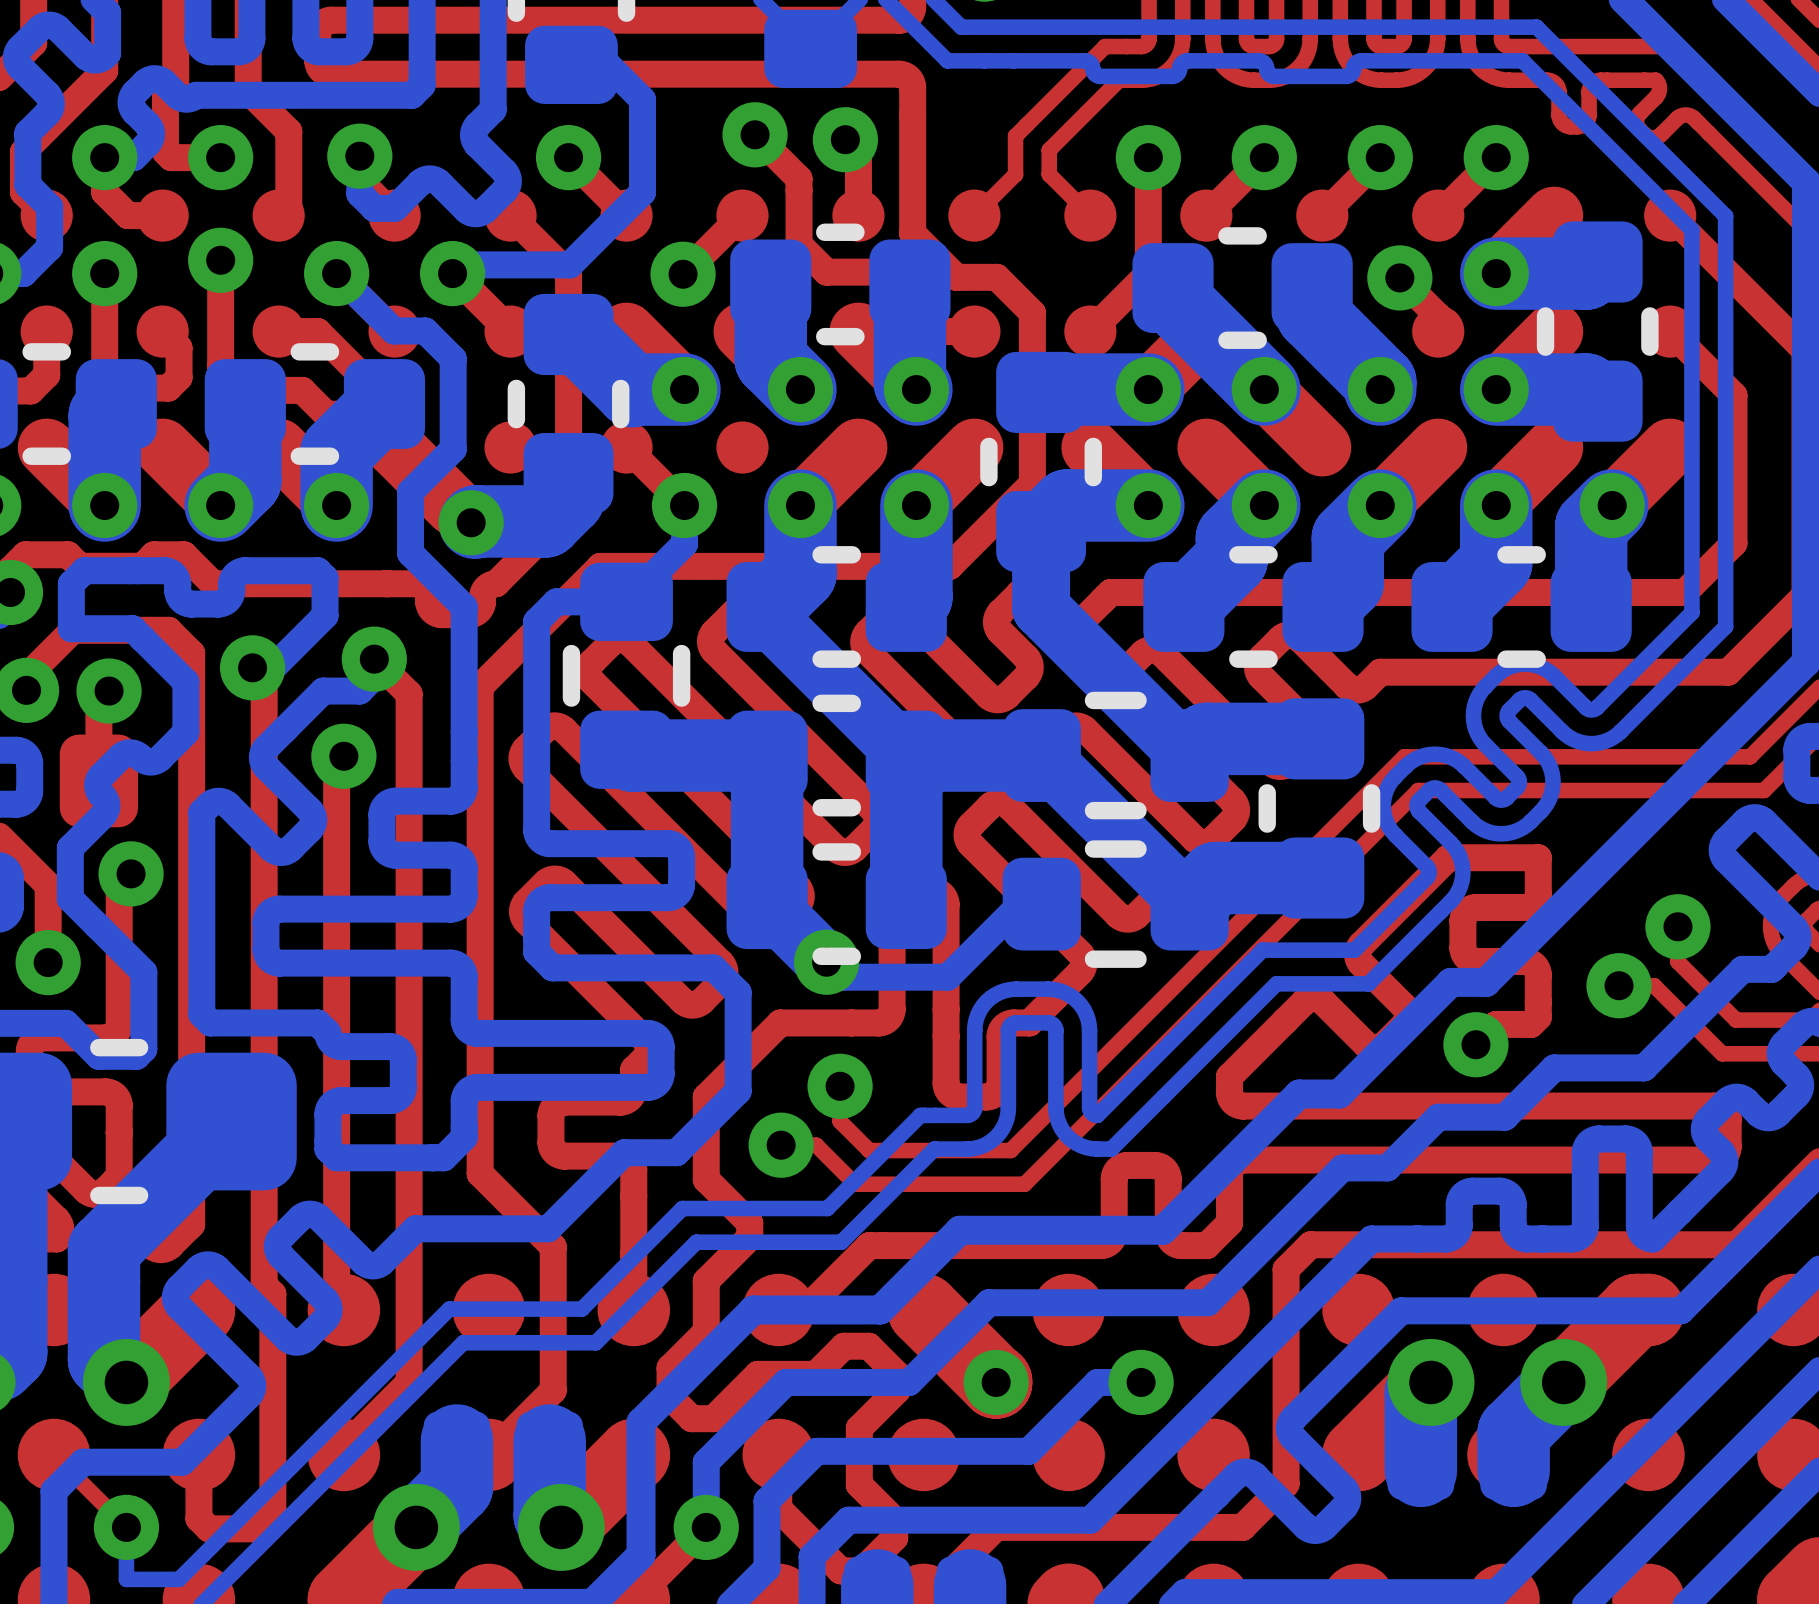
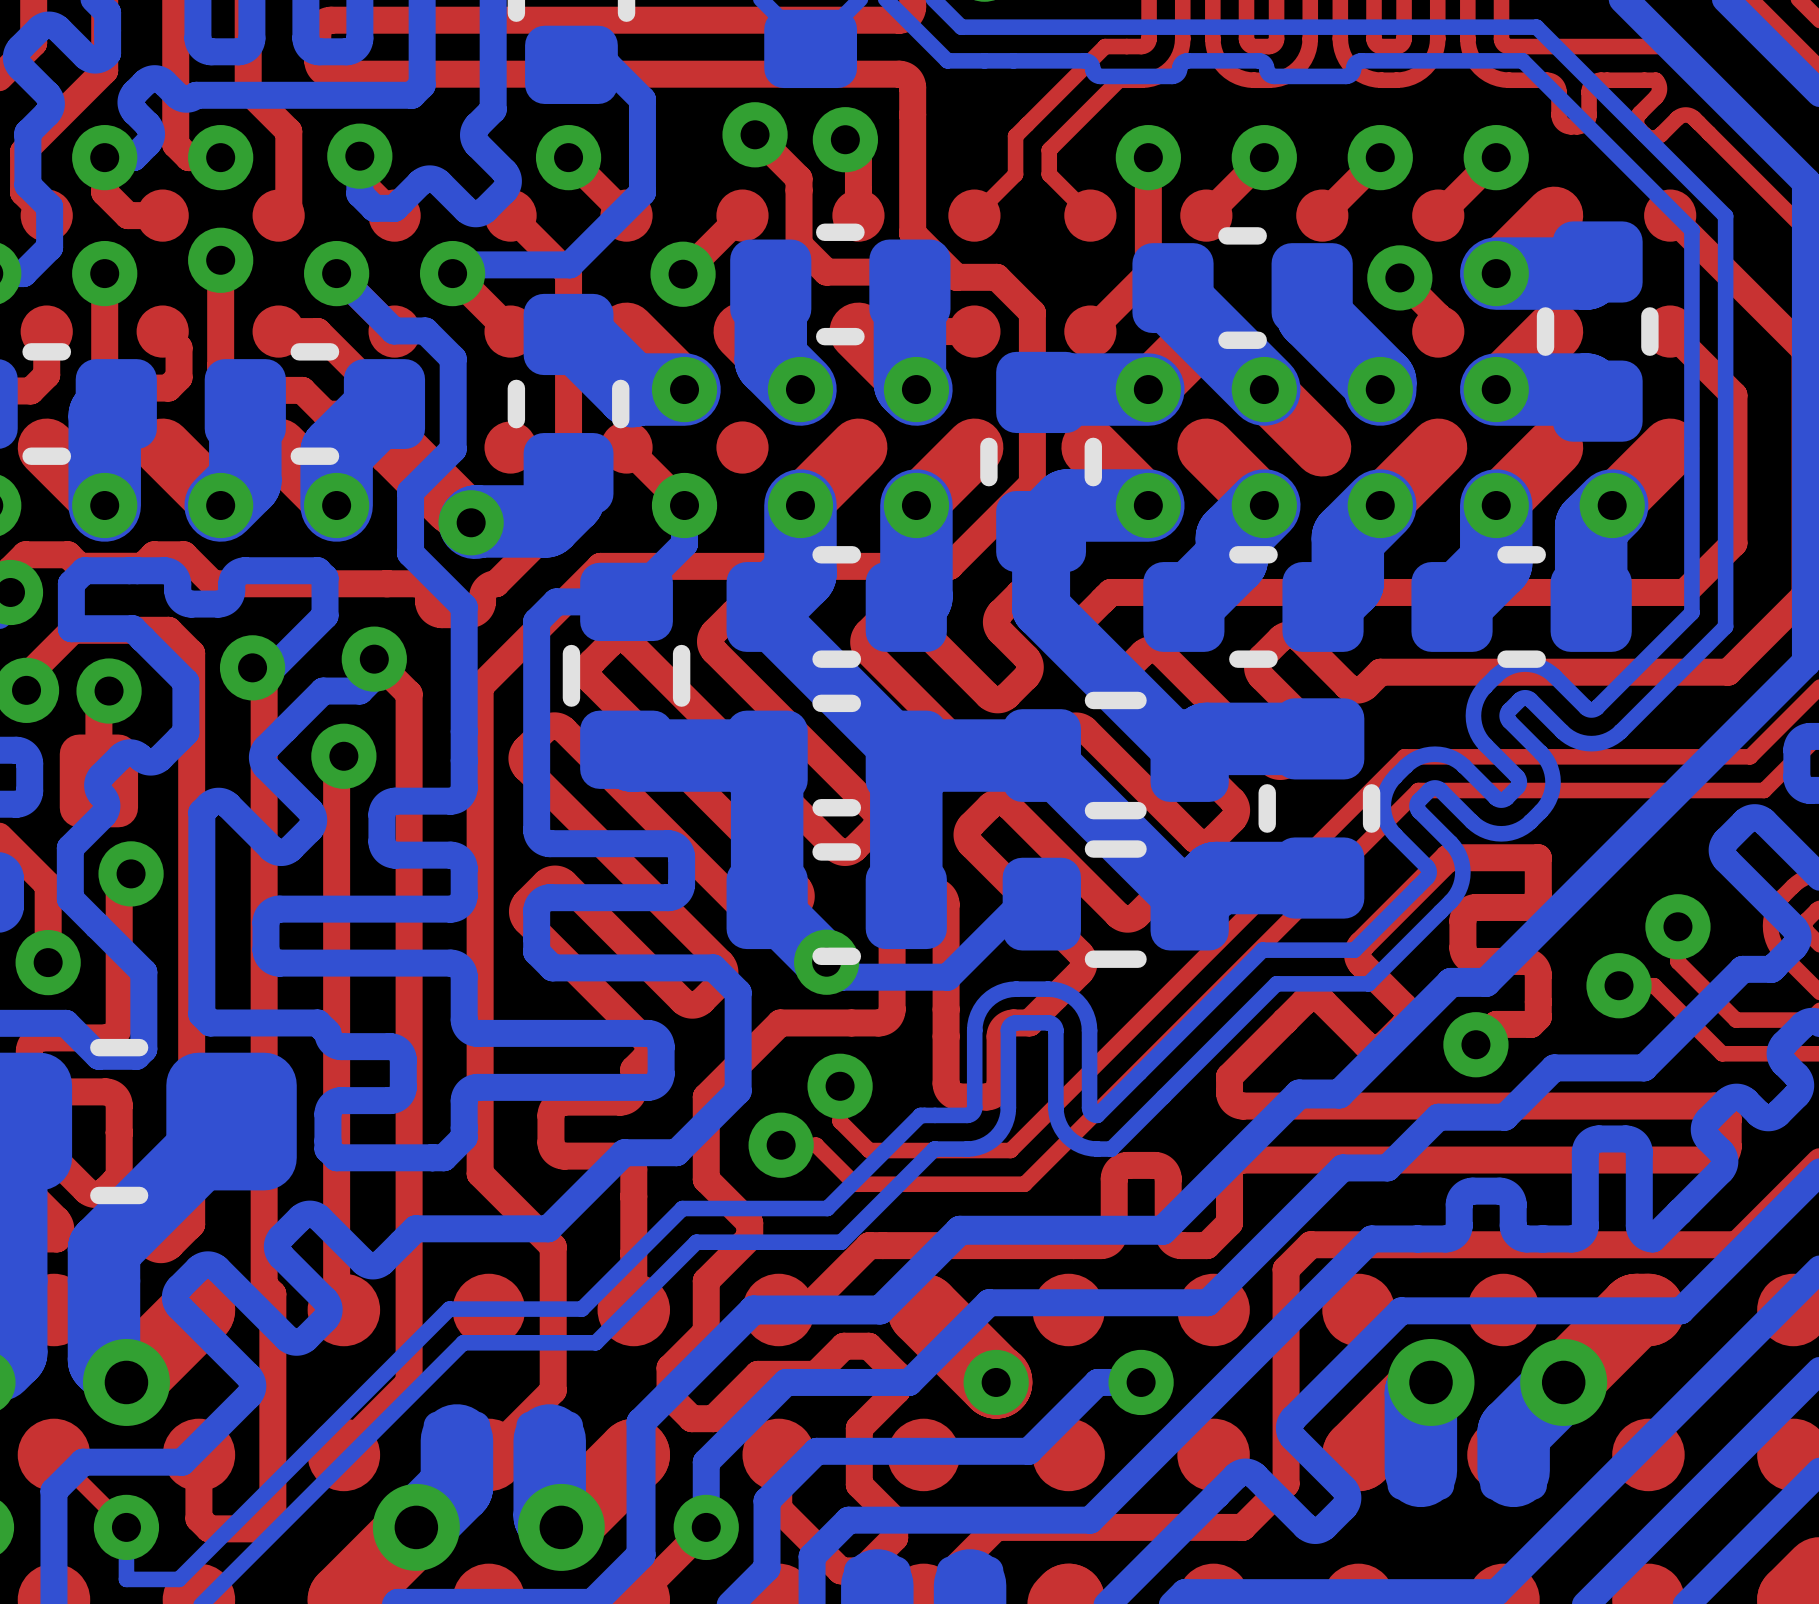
top track: (175, 85) (165, 95) (165, 151) (171, 157) (188, 157) -> (175, 85) (175, 144) (188, 157)

